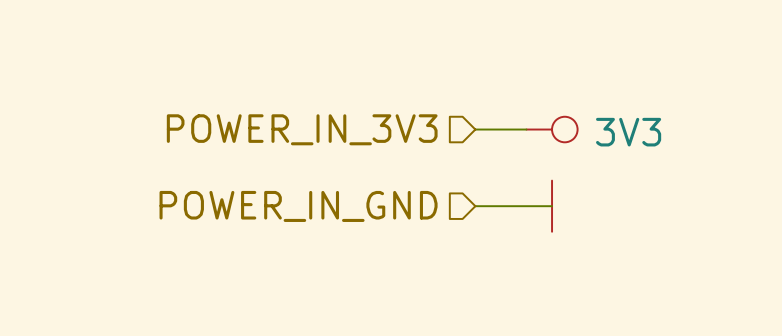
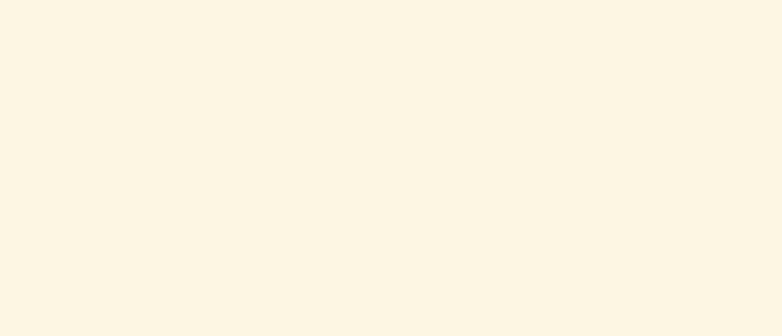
hierarchical label: POWER_IN_3V3 (302, 129) -> none
wire: (475, 129) (526, 129) -> none
power symbol: 3V3 (552, 129) -> none
hierarchical label: POWER_IN_GND (298, 206) -> none
wire: (475, 206) (552, 206) -> none
power symbol: (552, 206) -> none

